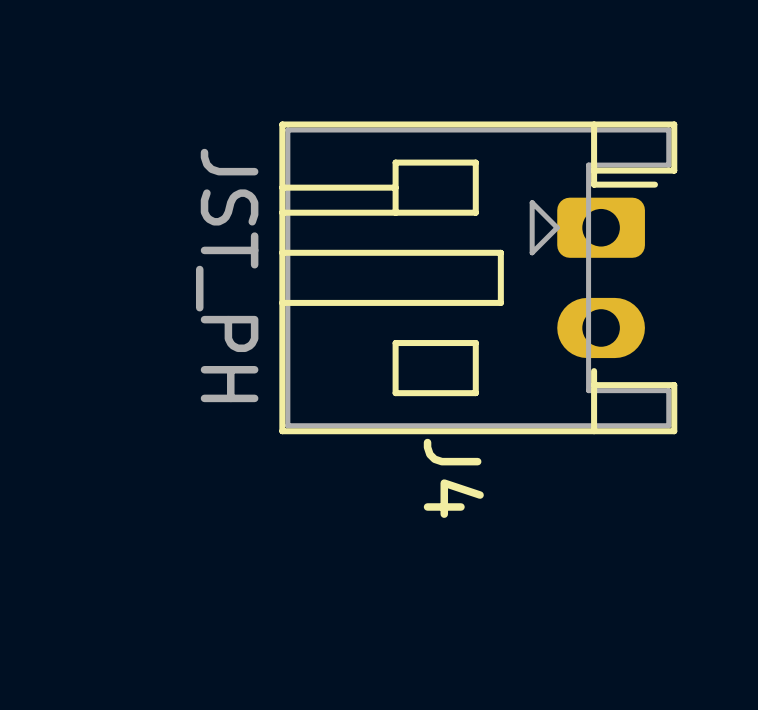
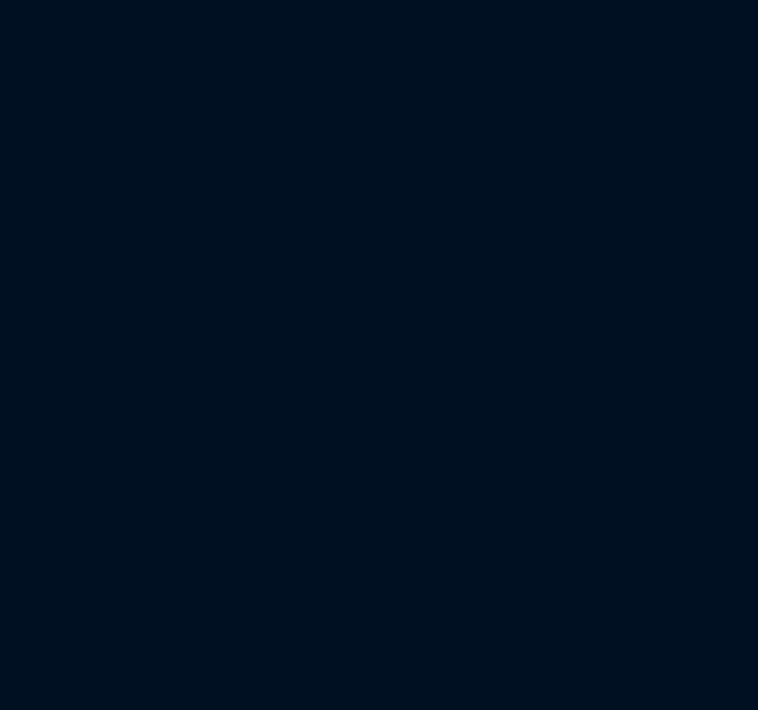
J4: JST_PH (478, 277) -> none

